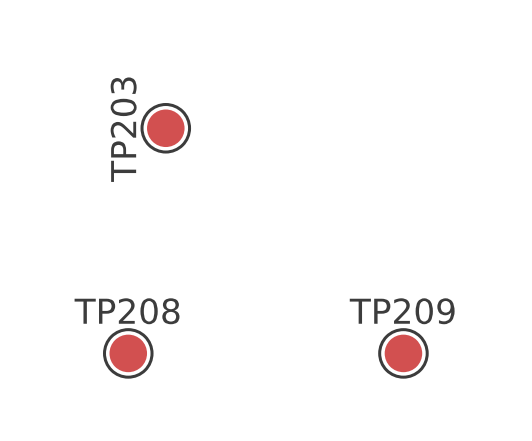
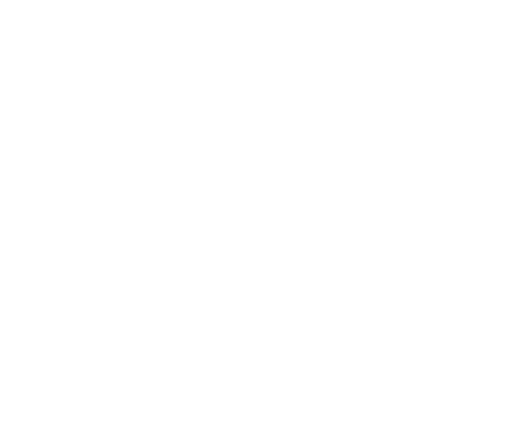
TP203: (165, 128) -> none
TP208: (128, 353) -> none
TP209: (403, 353) -> none

